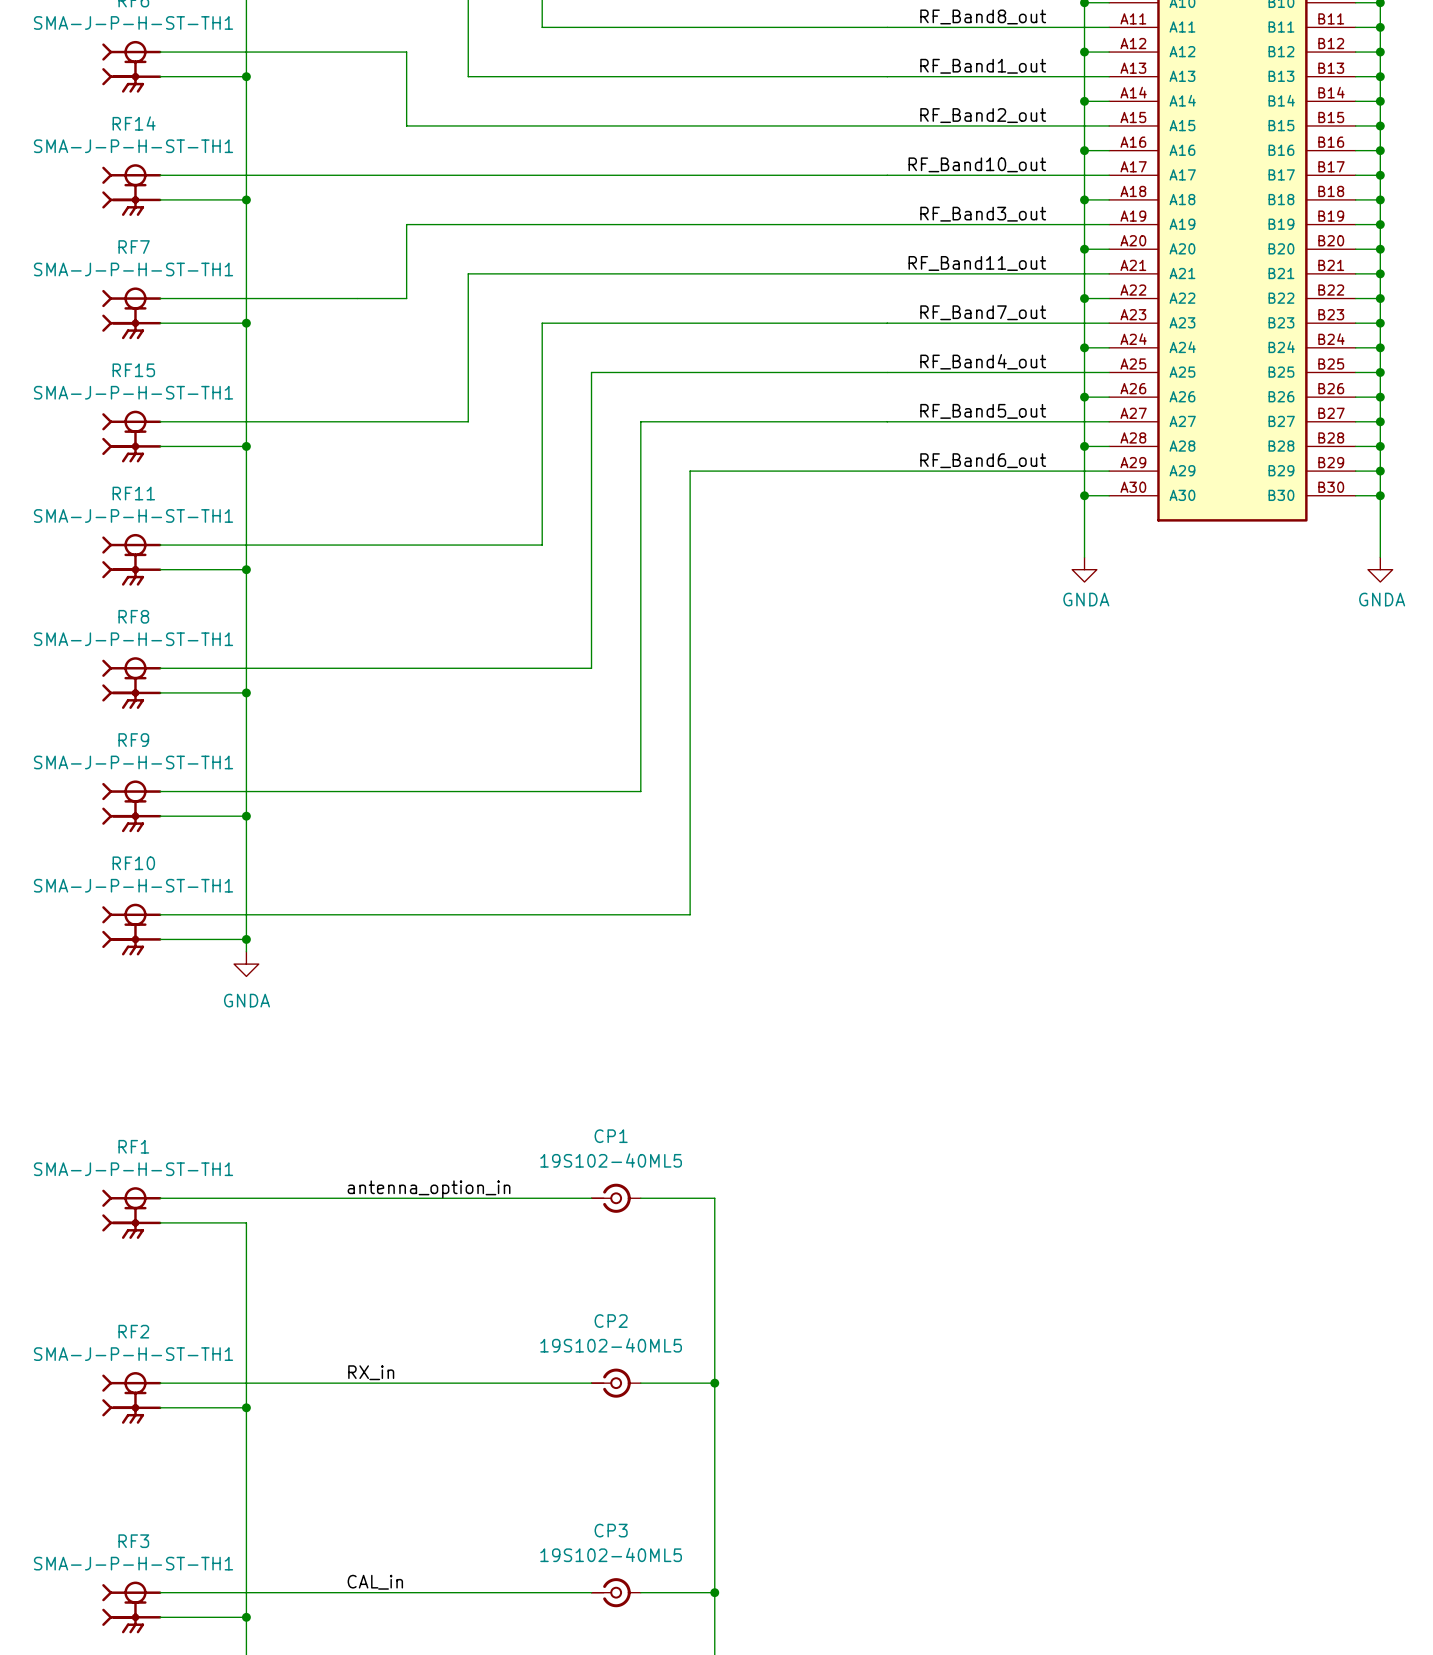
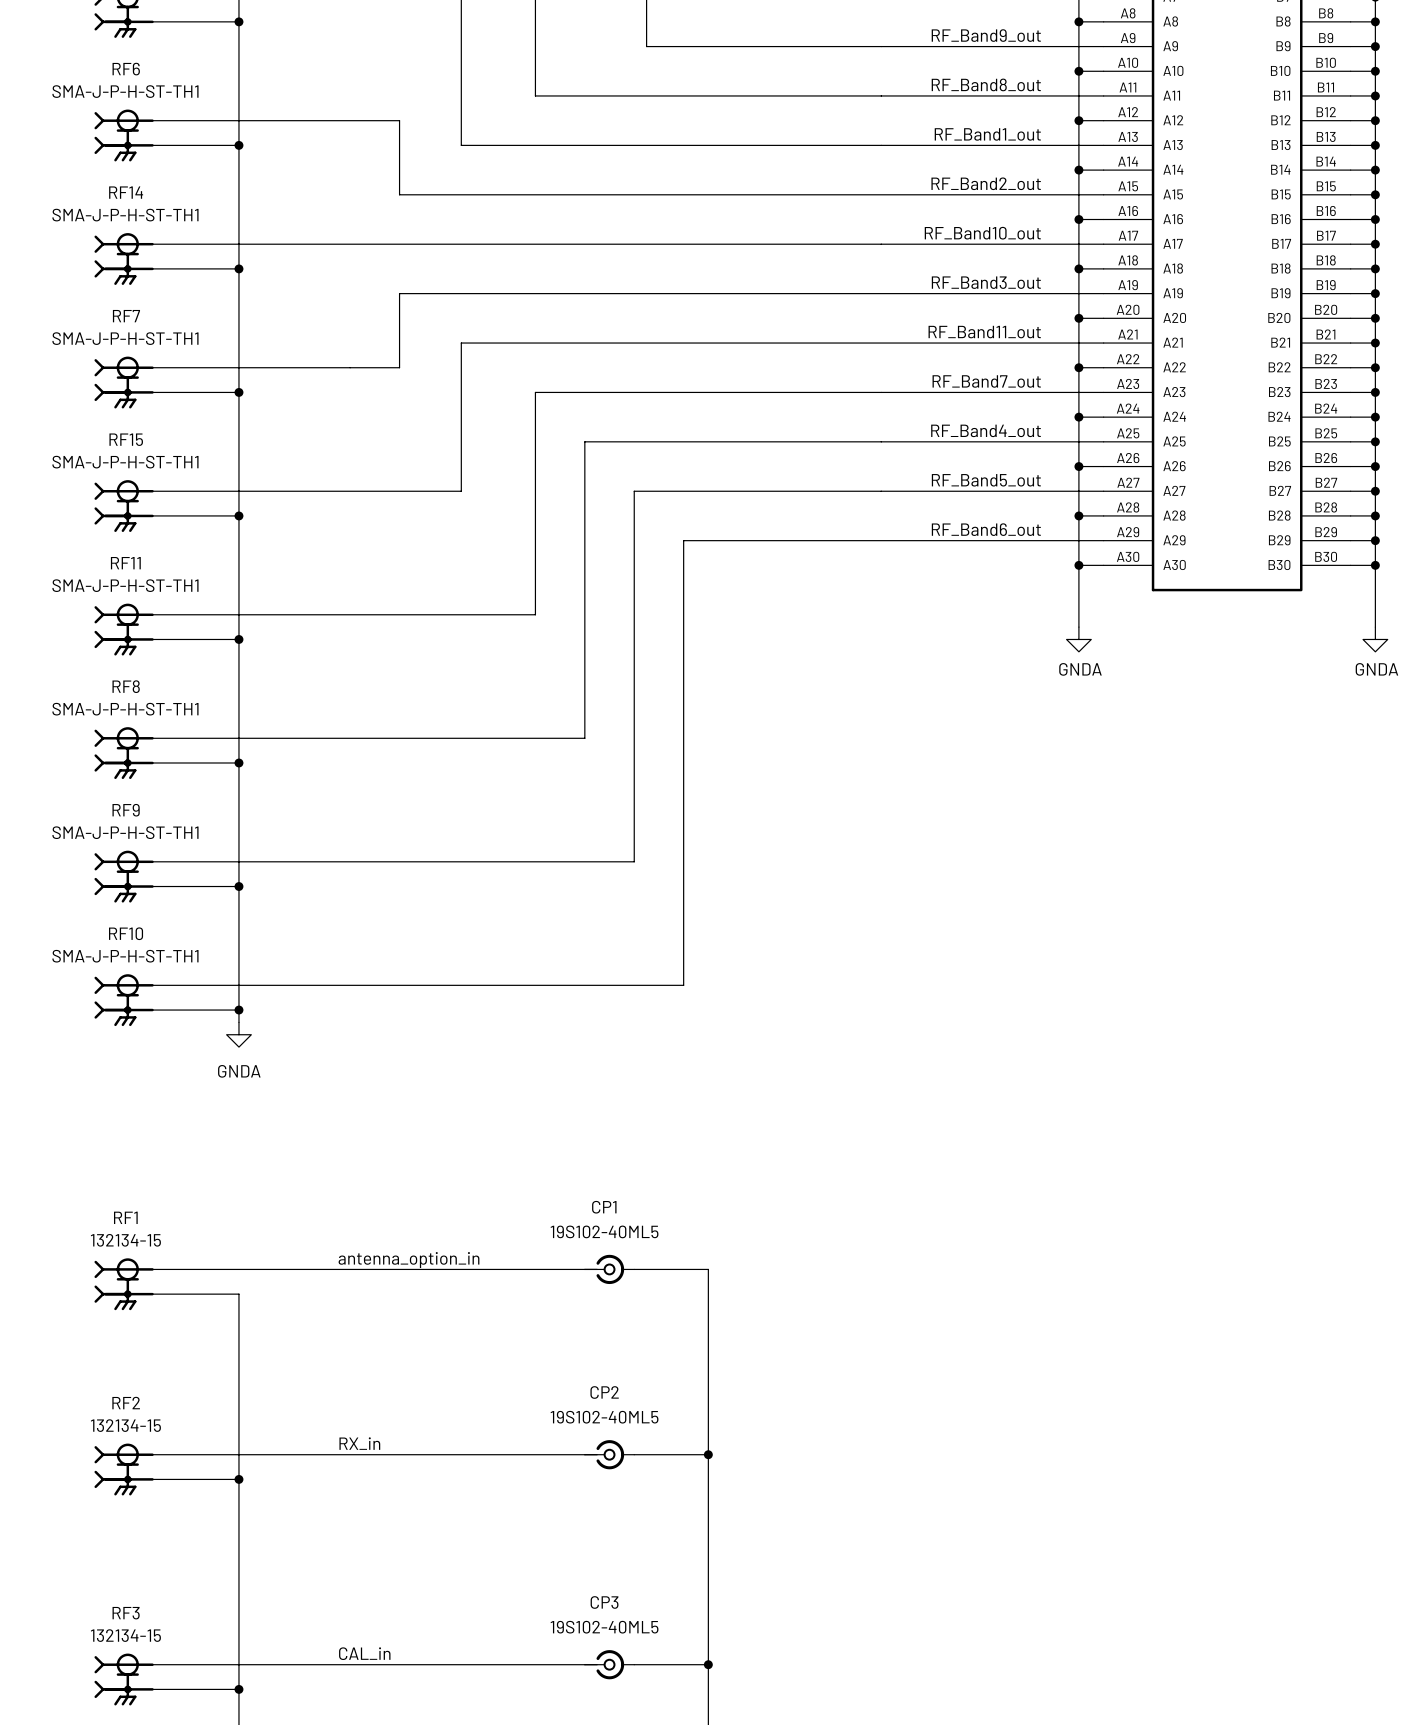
RF1 value: SMA-J-P-H-ST-TH1 (133, 1169) -> 132134-15 (125, 1240)
RF2 value: SMA-J-P-H-ST-TH1 (133, 1354) -> 132134-15 (125, 1425)
RF3 value: SMA-J-P-H-ST-TH1 (133, 1563) -> 132134-15 (125, 1635)

